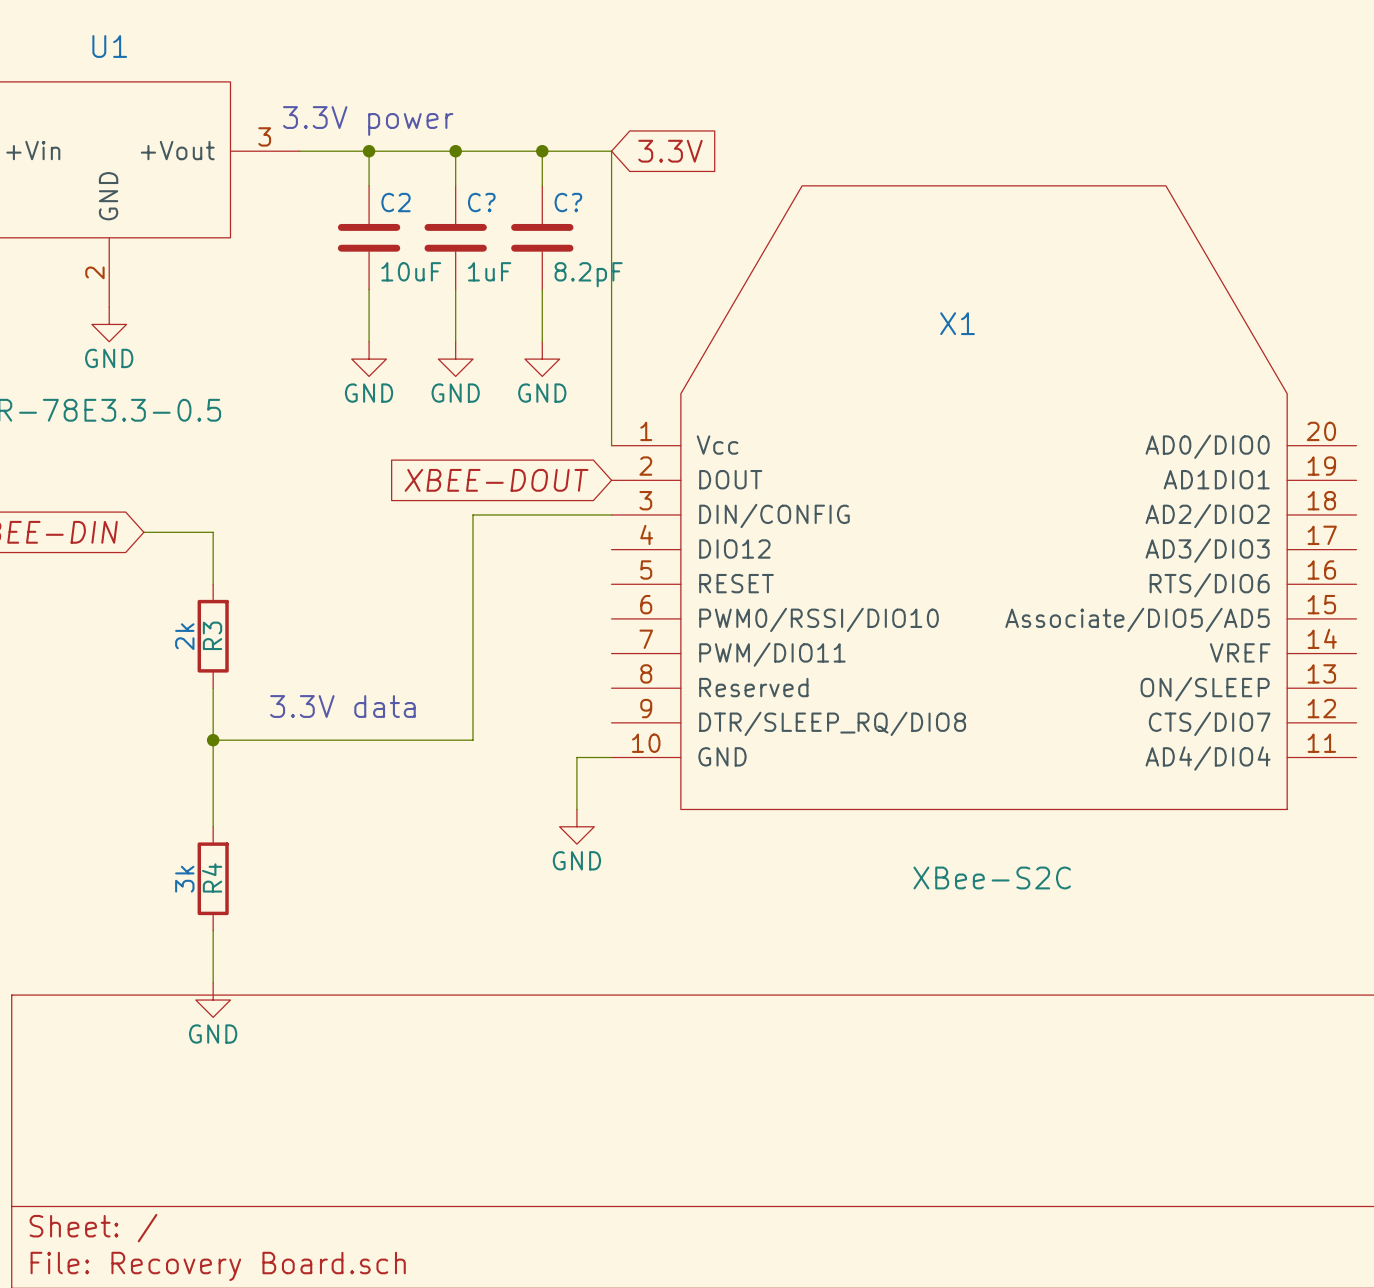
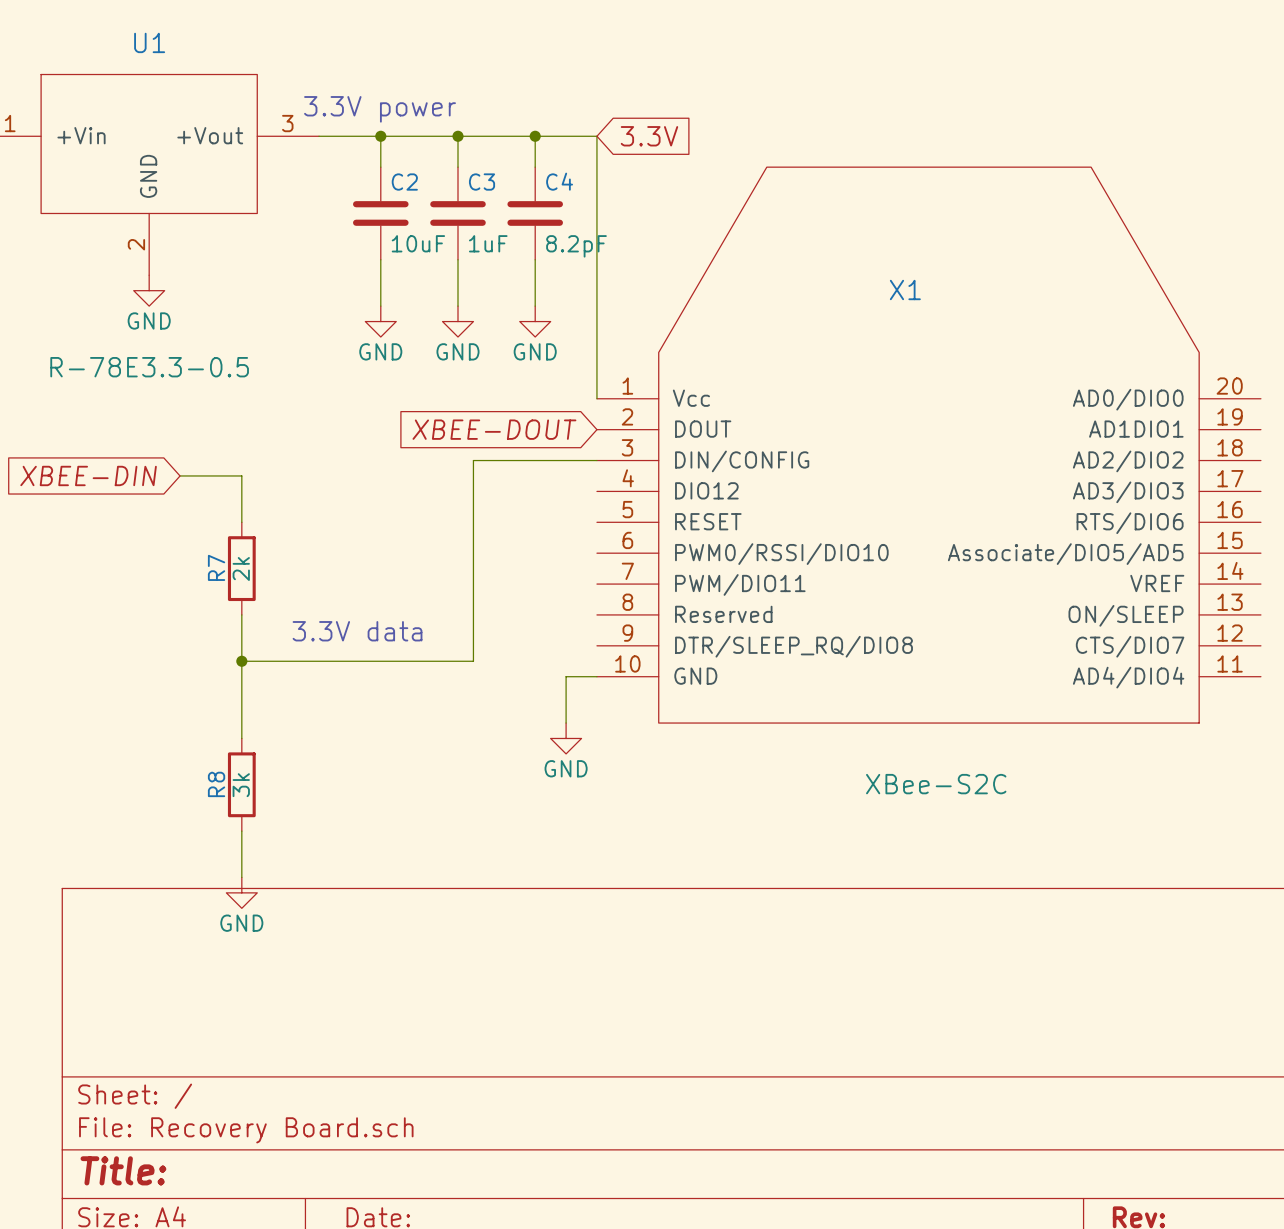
C? name: C? (481, 202) -> C3 (482, 182)
C? name: C? (568, 202) -> C4 (559, 181)
2k value: R3 (212, 635) -> 2k (241, 568)
2k name: 2k (184, 636) -> R7 (216, 567)
3k value: R4 (212, 877) -> 3k (241, 785)
3k name: 3k (184, 879) -> R8 (216, 784)

